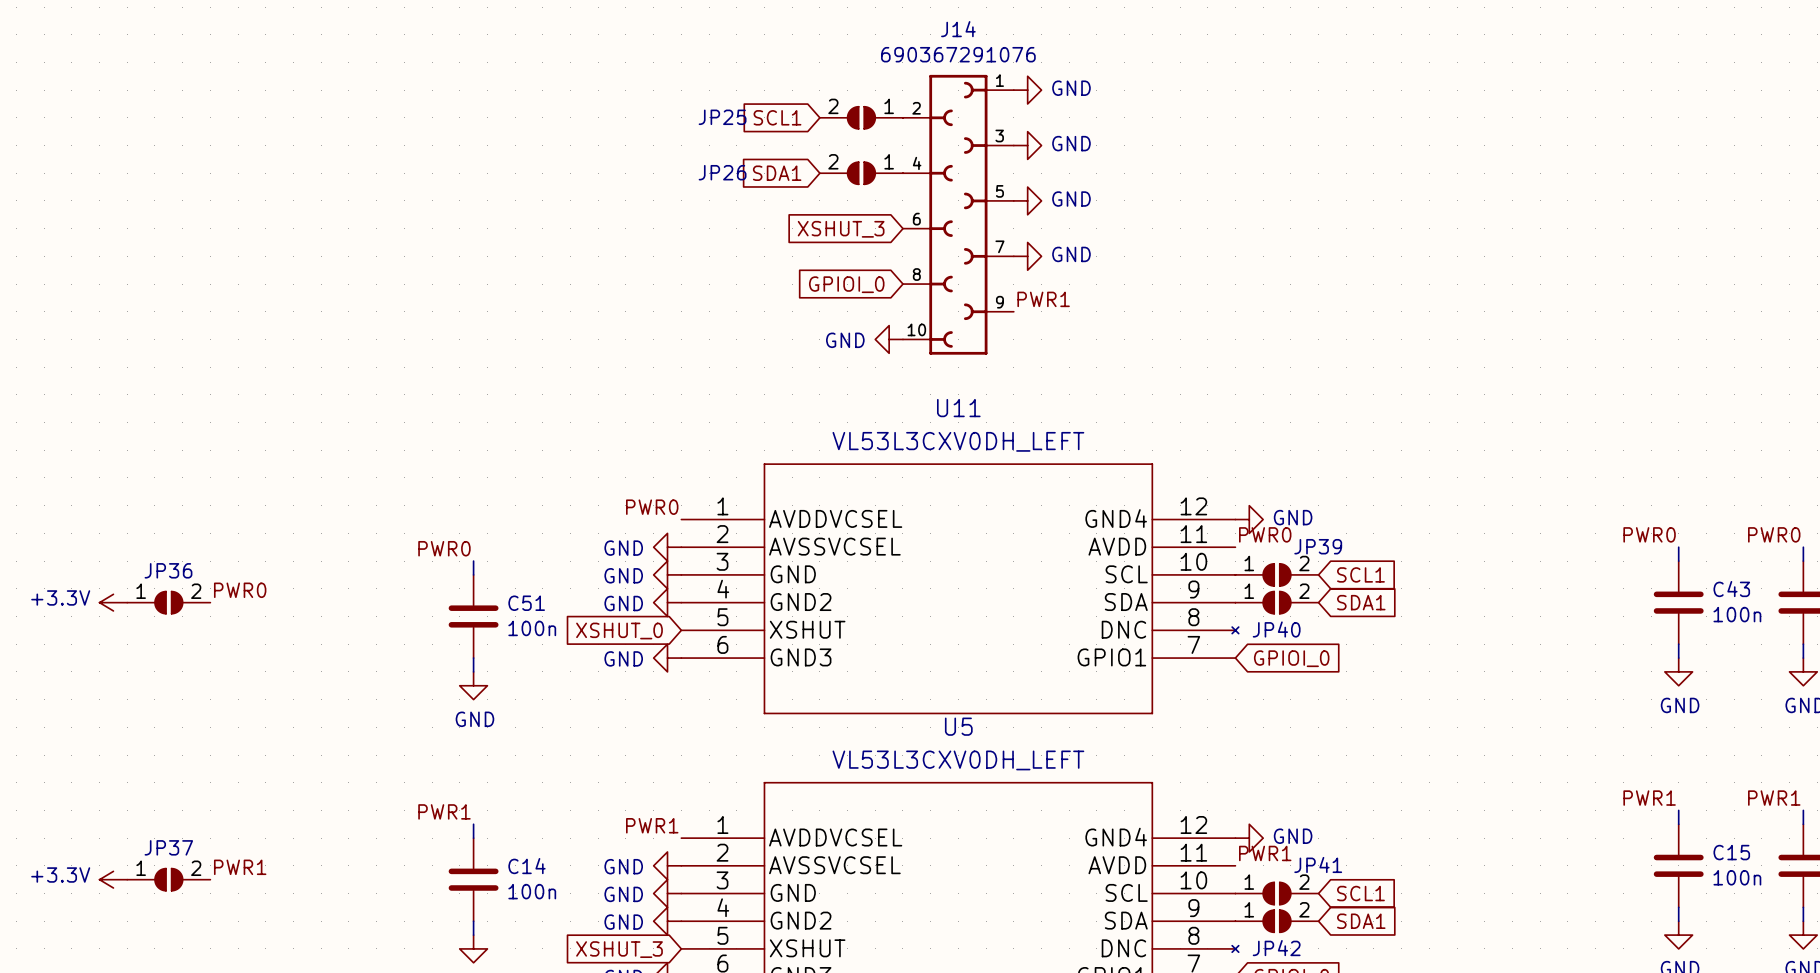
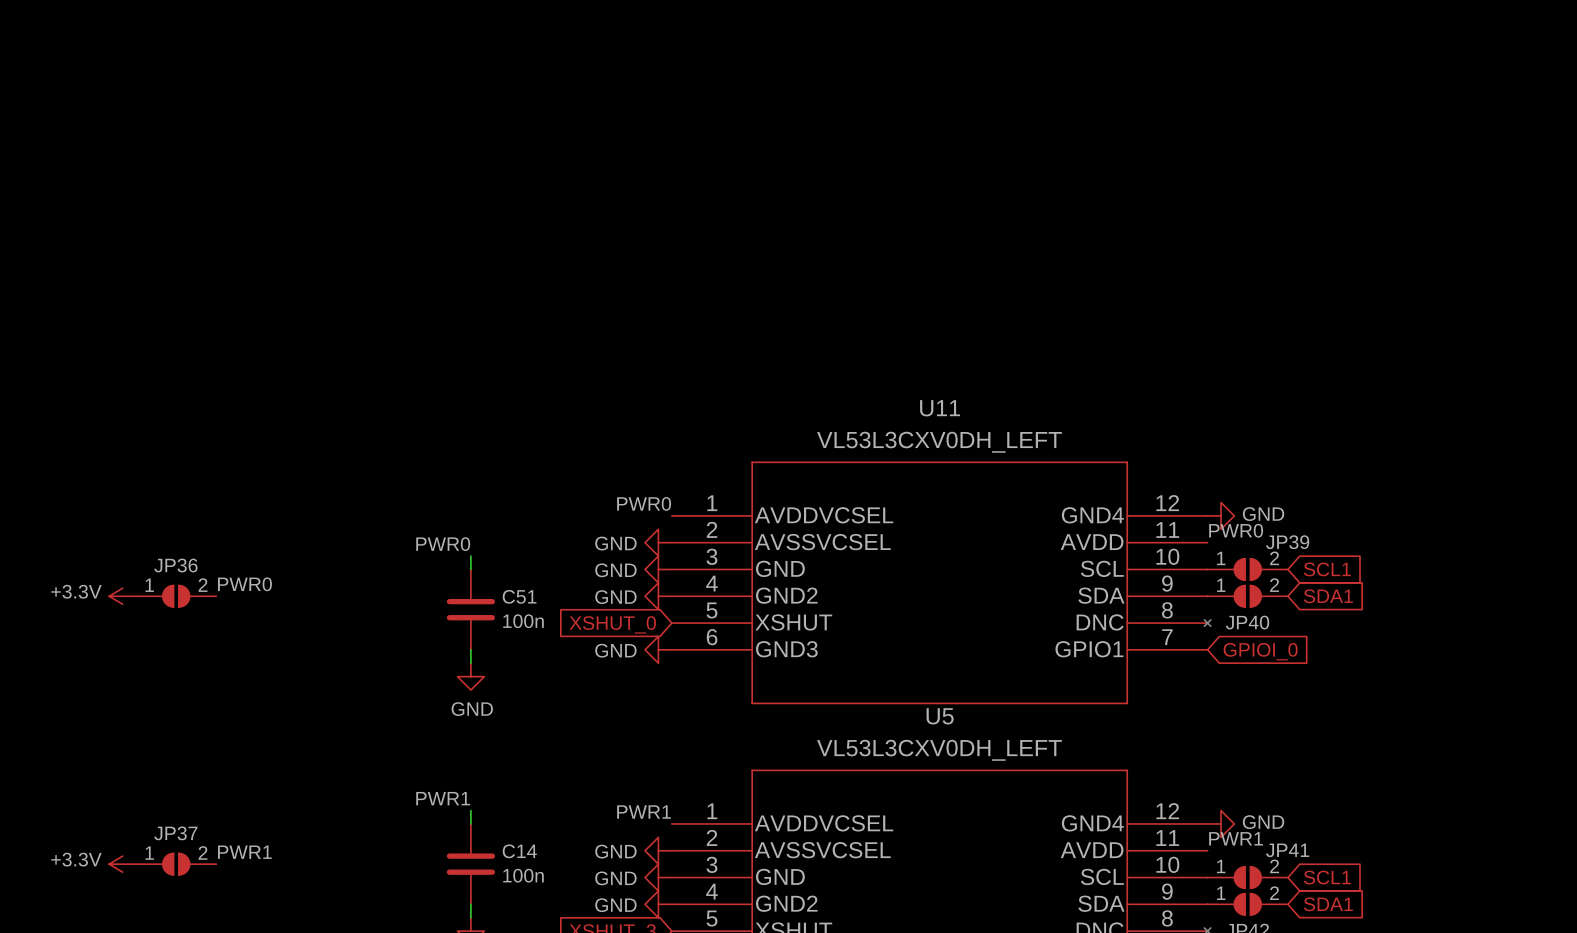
power symbol: GND (1027, 90) -> none
global label: SCL1 (777, 117) -> none
JP25: (861, 117) -> none
power symbol: GND (1027, 145) -> none
global label: SDA1 (777, 173) -> none
JP26: (861, 173) -> none
power symbol: GND (1027, 200) -> none
J14: 690367291076 (958, 214) -> none
global label: XSHUT_3 (841, 229) -> none
power symbol: GND (1027, 256) -> none
global label: GPIOI_0 (846, 284) -> none
label: PWR1 (1043, 299) -> none
power symbol: GND (889, 339) -> none

